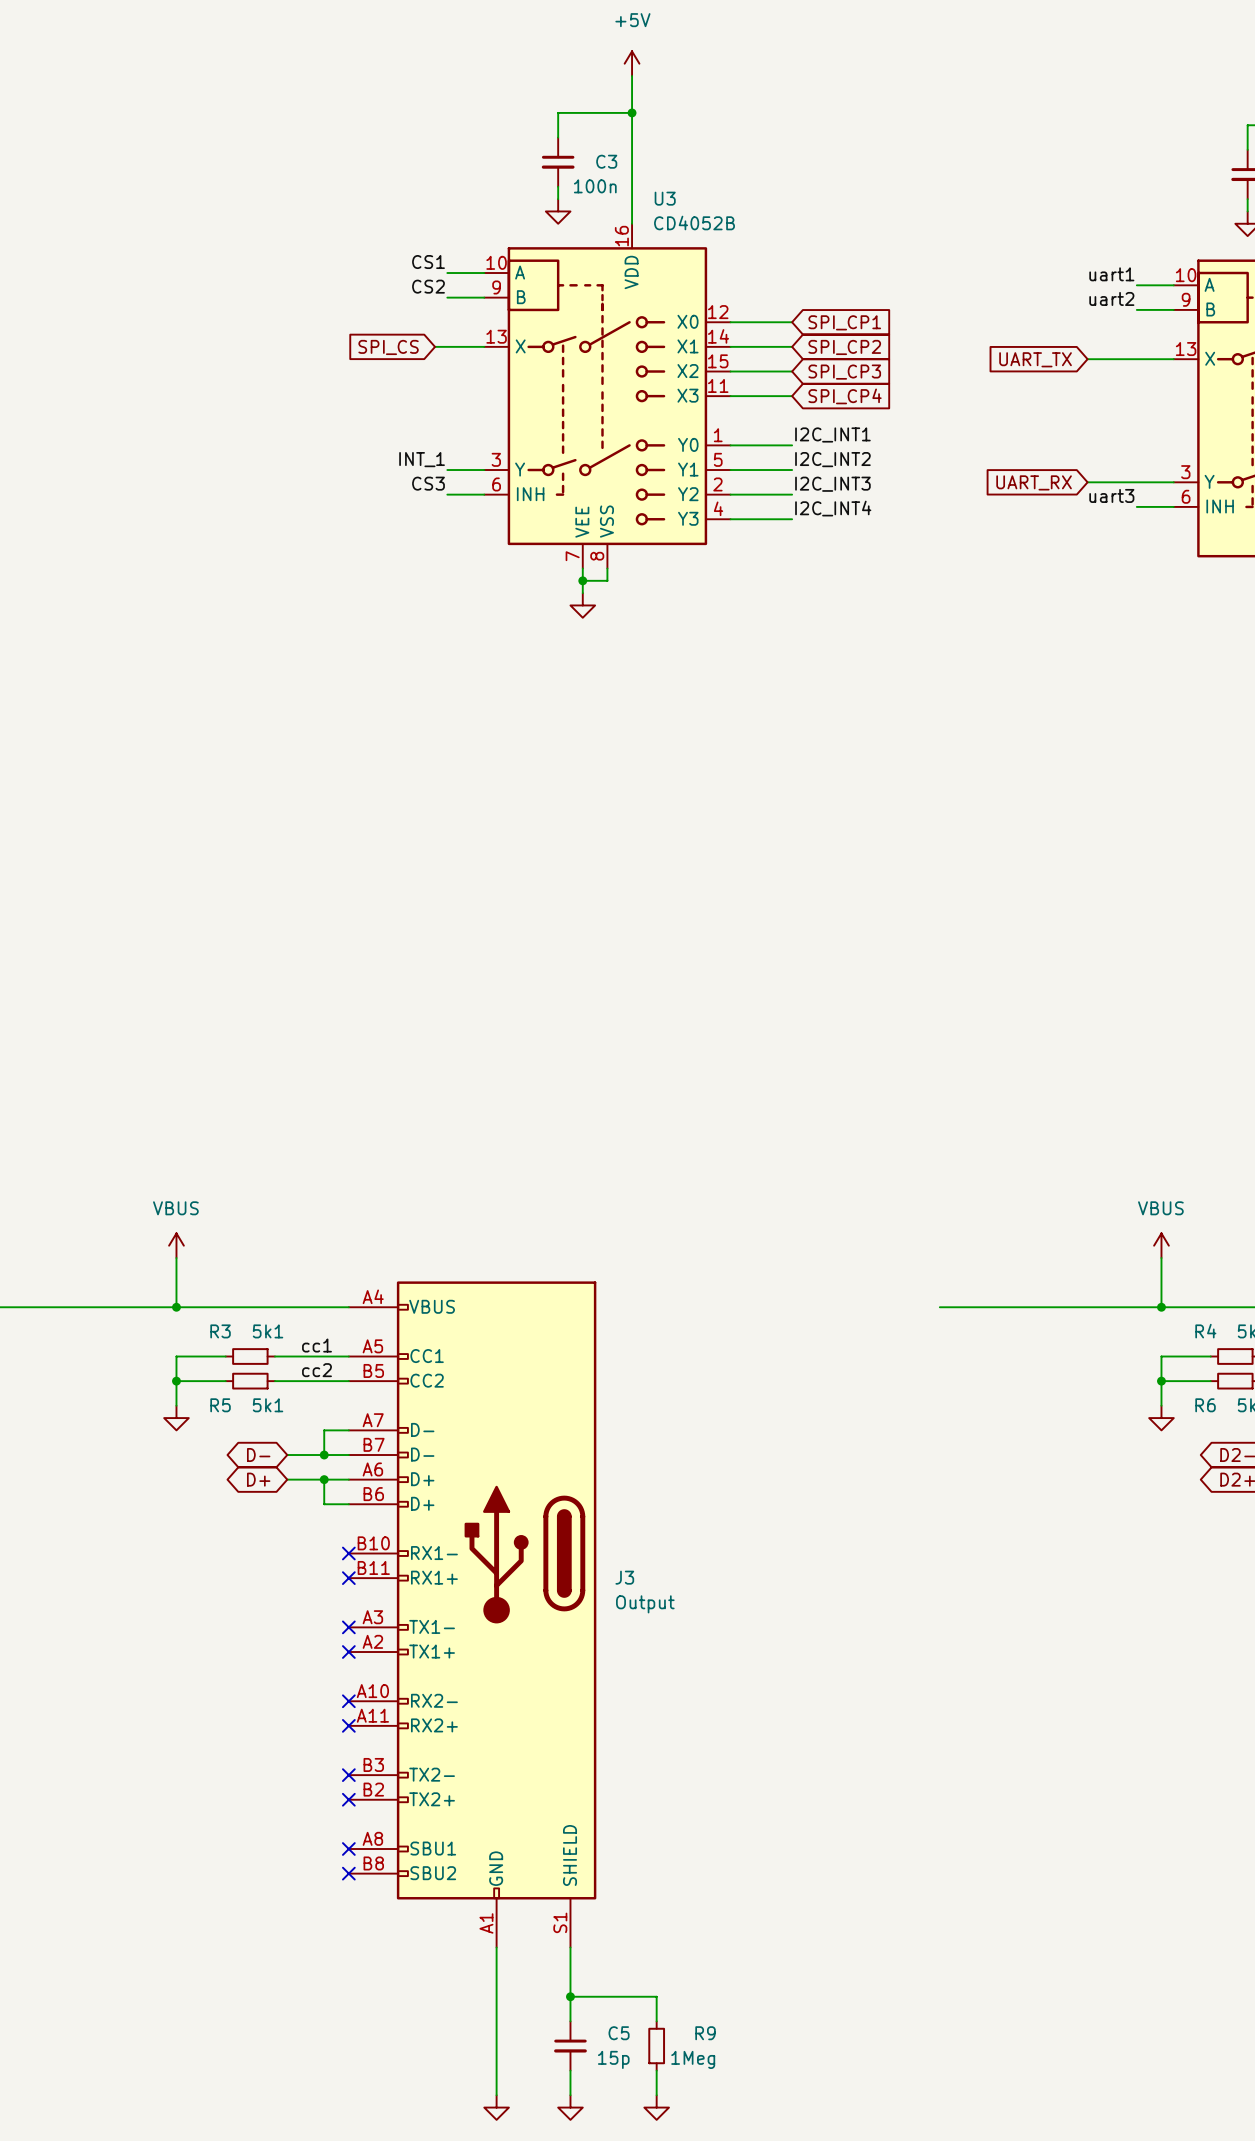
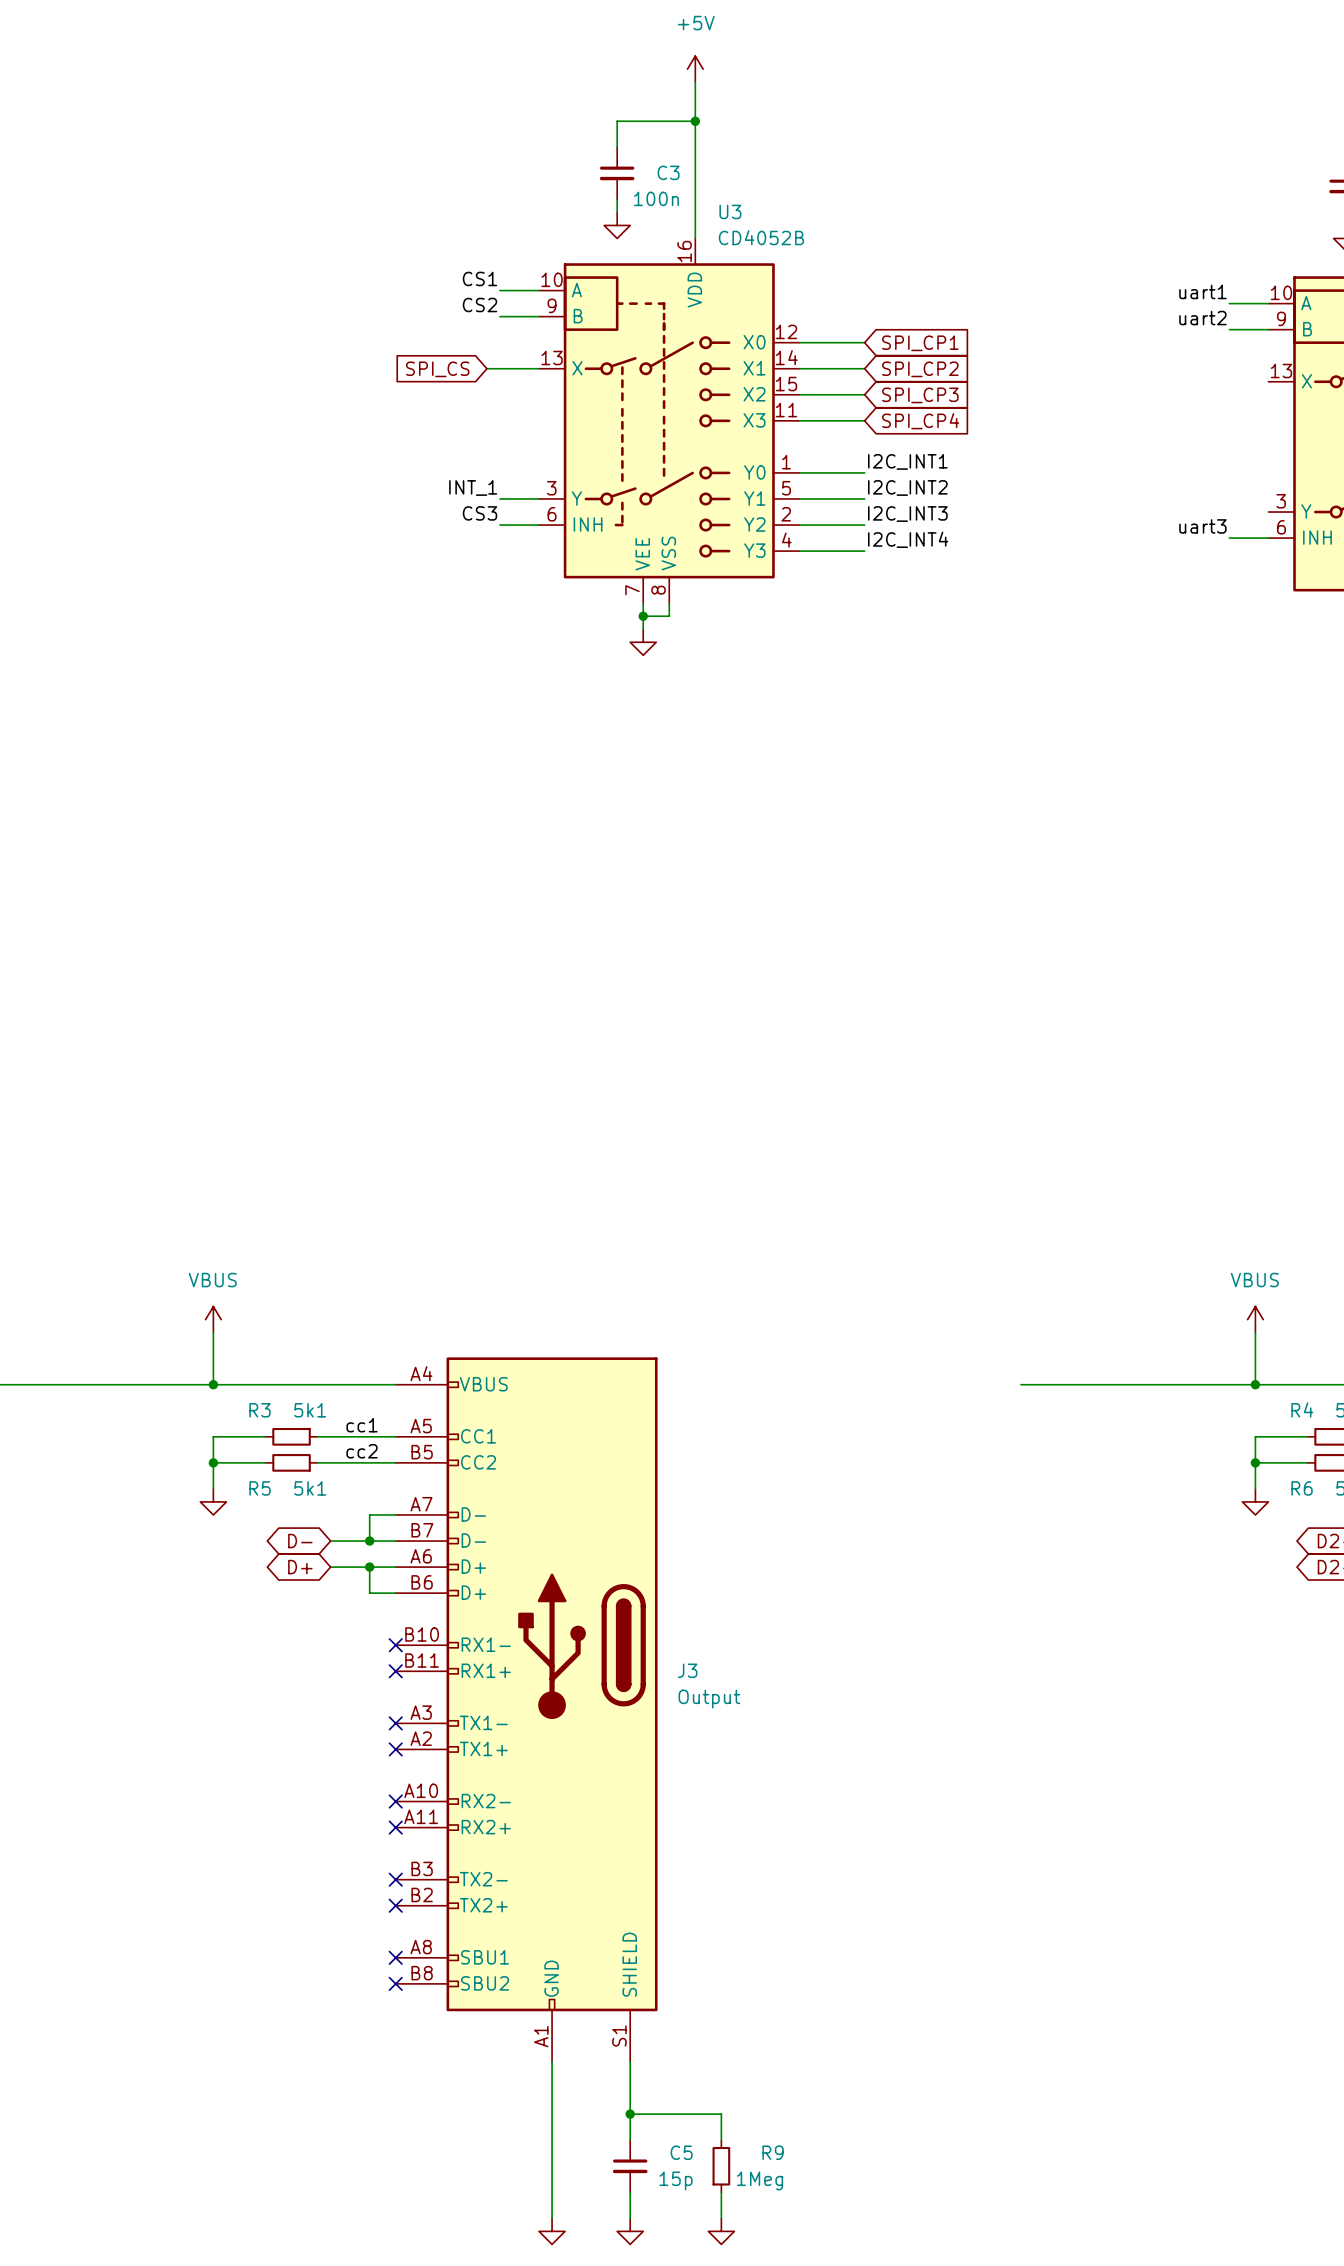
global label: UART_TX (1035, 359) -> none
wire: (1087, 359) (1173, 359) -> none
global label: UART_RX (1034, 482) -> none
wire: (1087, 482) (1173, 482) -> none

